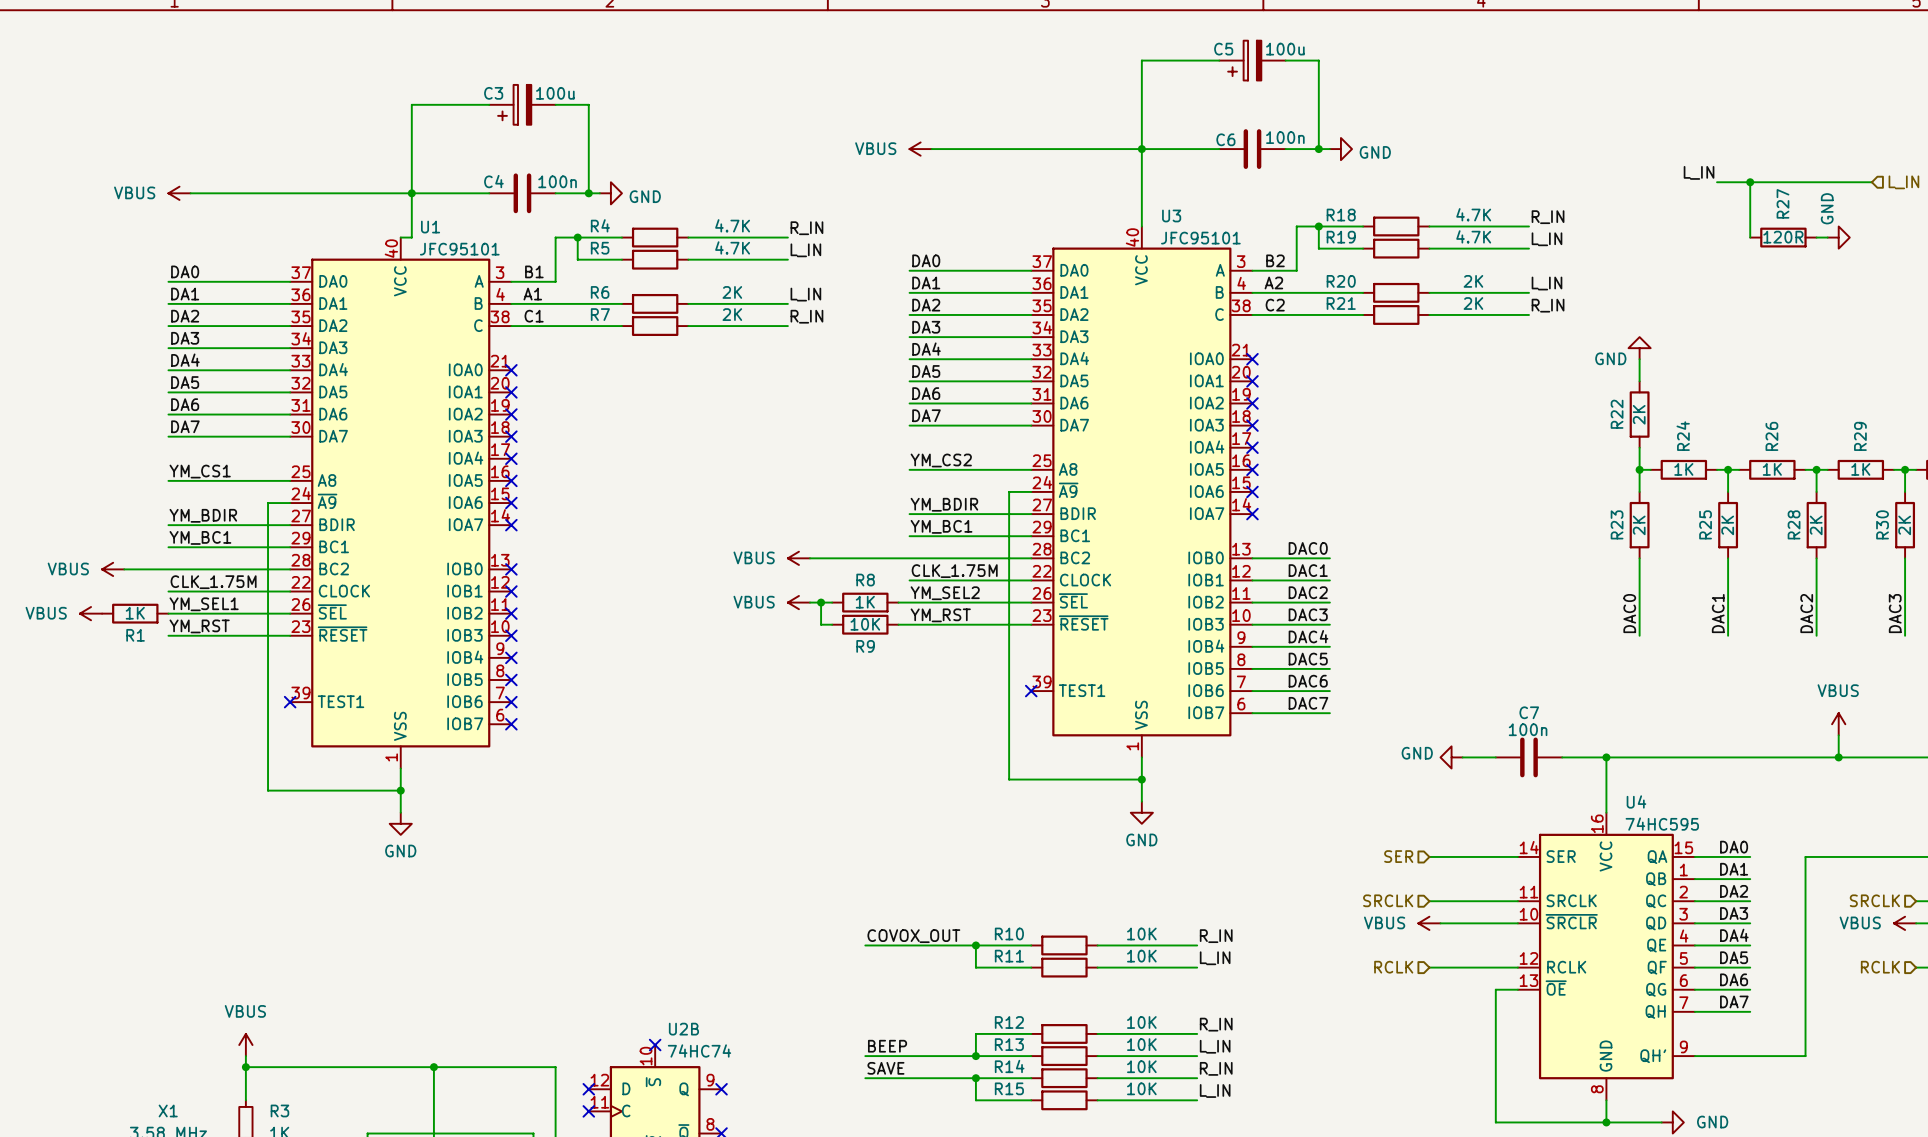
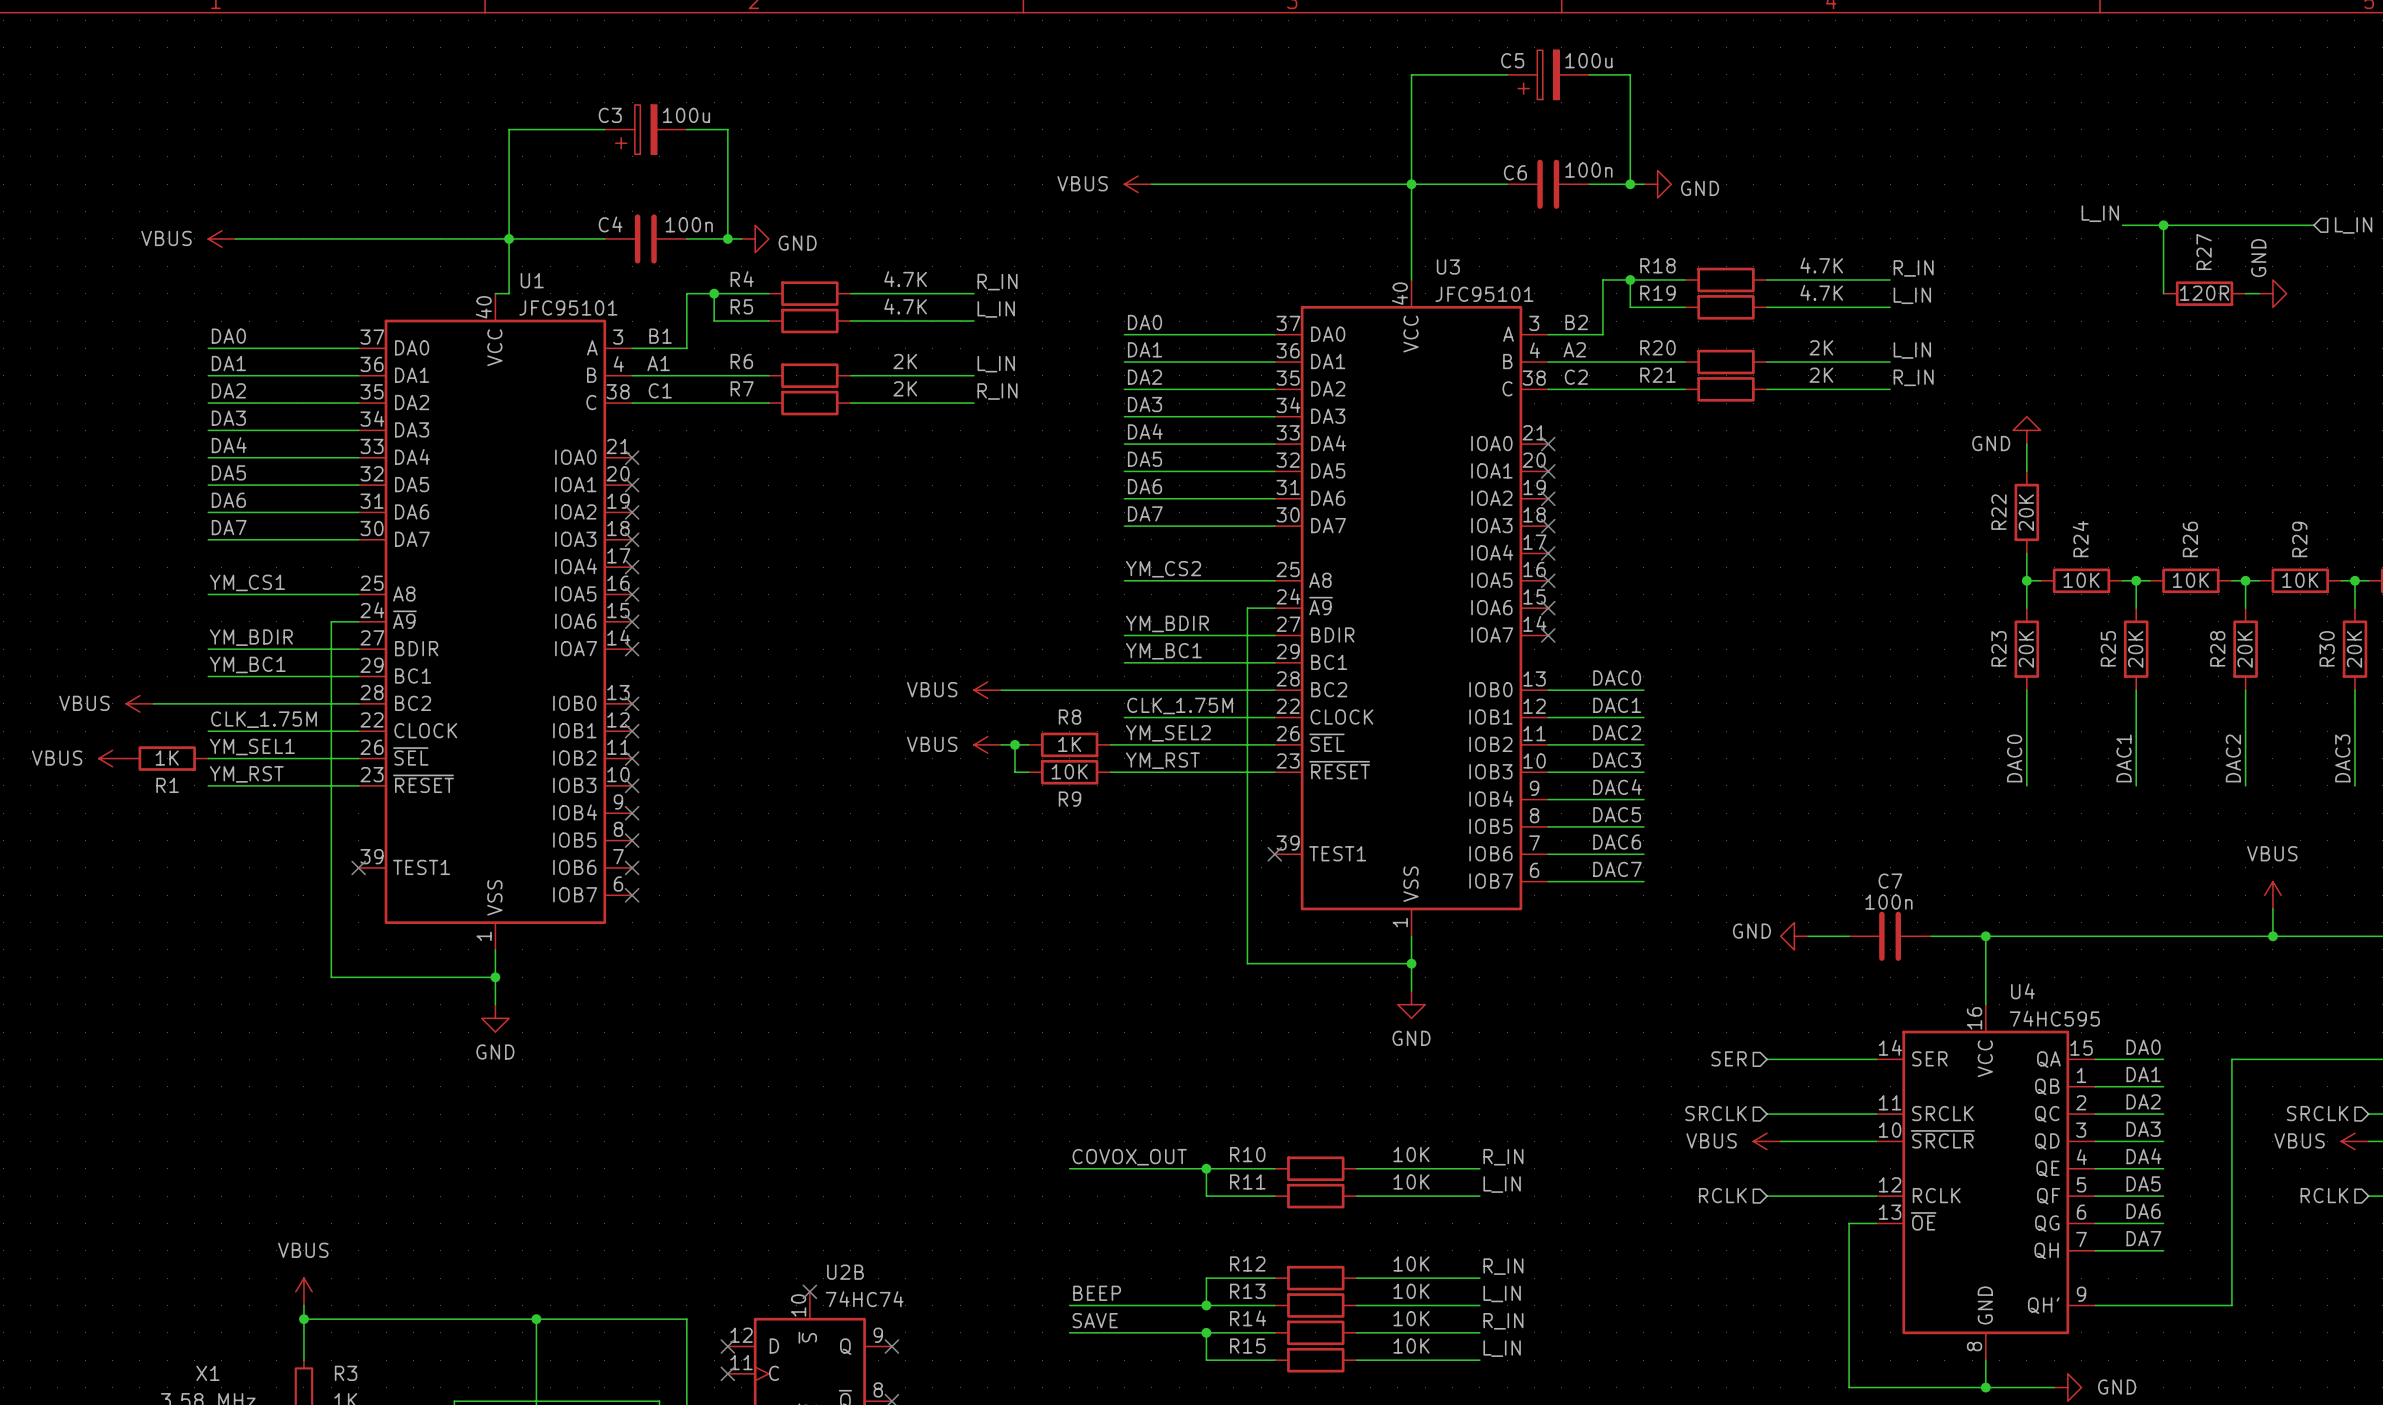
R22 value: 2K (1639, 414) -> 20K (2026, 512)
R24 value: 1K (1683, 469) -> 10K (2081, 580)
R26 value: 1K (1772, 469) -> 10K (2190, 580)
R29 value: 1K (1860, 469) -> 10K (2300, 580)
R23 value: 2K (1639, 525) -> 20K (2026, 649)
R25 value: 2K (1727, 525) -> 20K (2135, 649)
R28 value: 2K (1816, 525) -> 20K (2245, 649)
R30 value: 2K (1904, 525) -> 20K (2354, 649)

